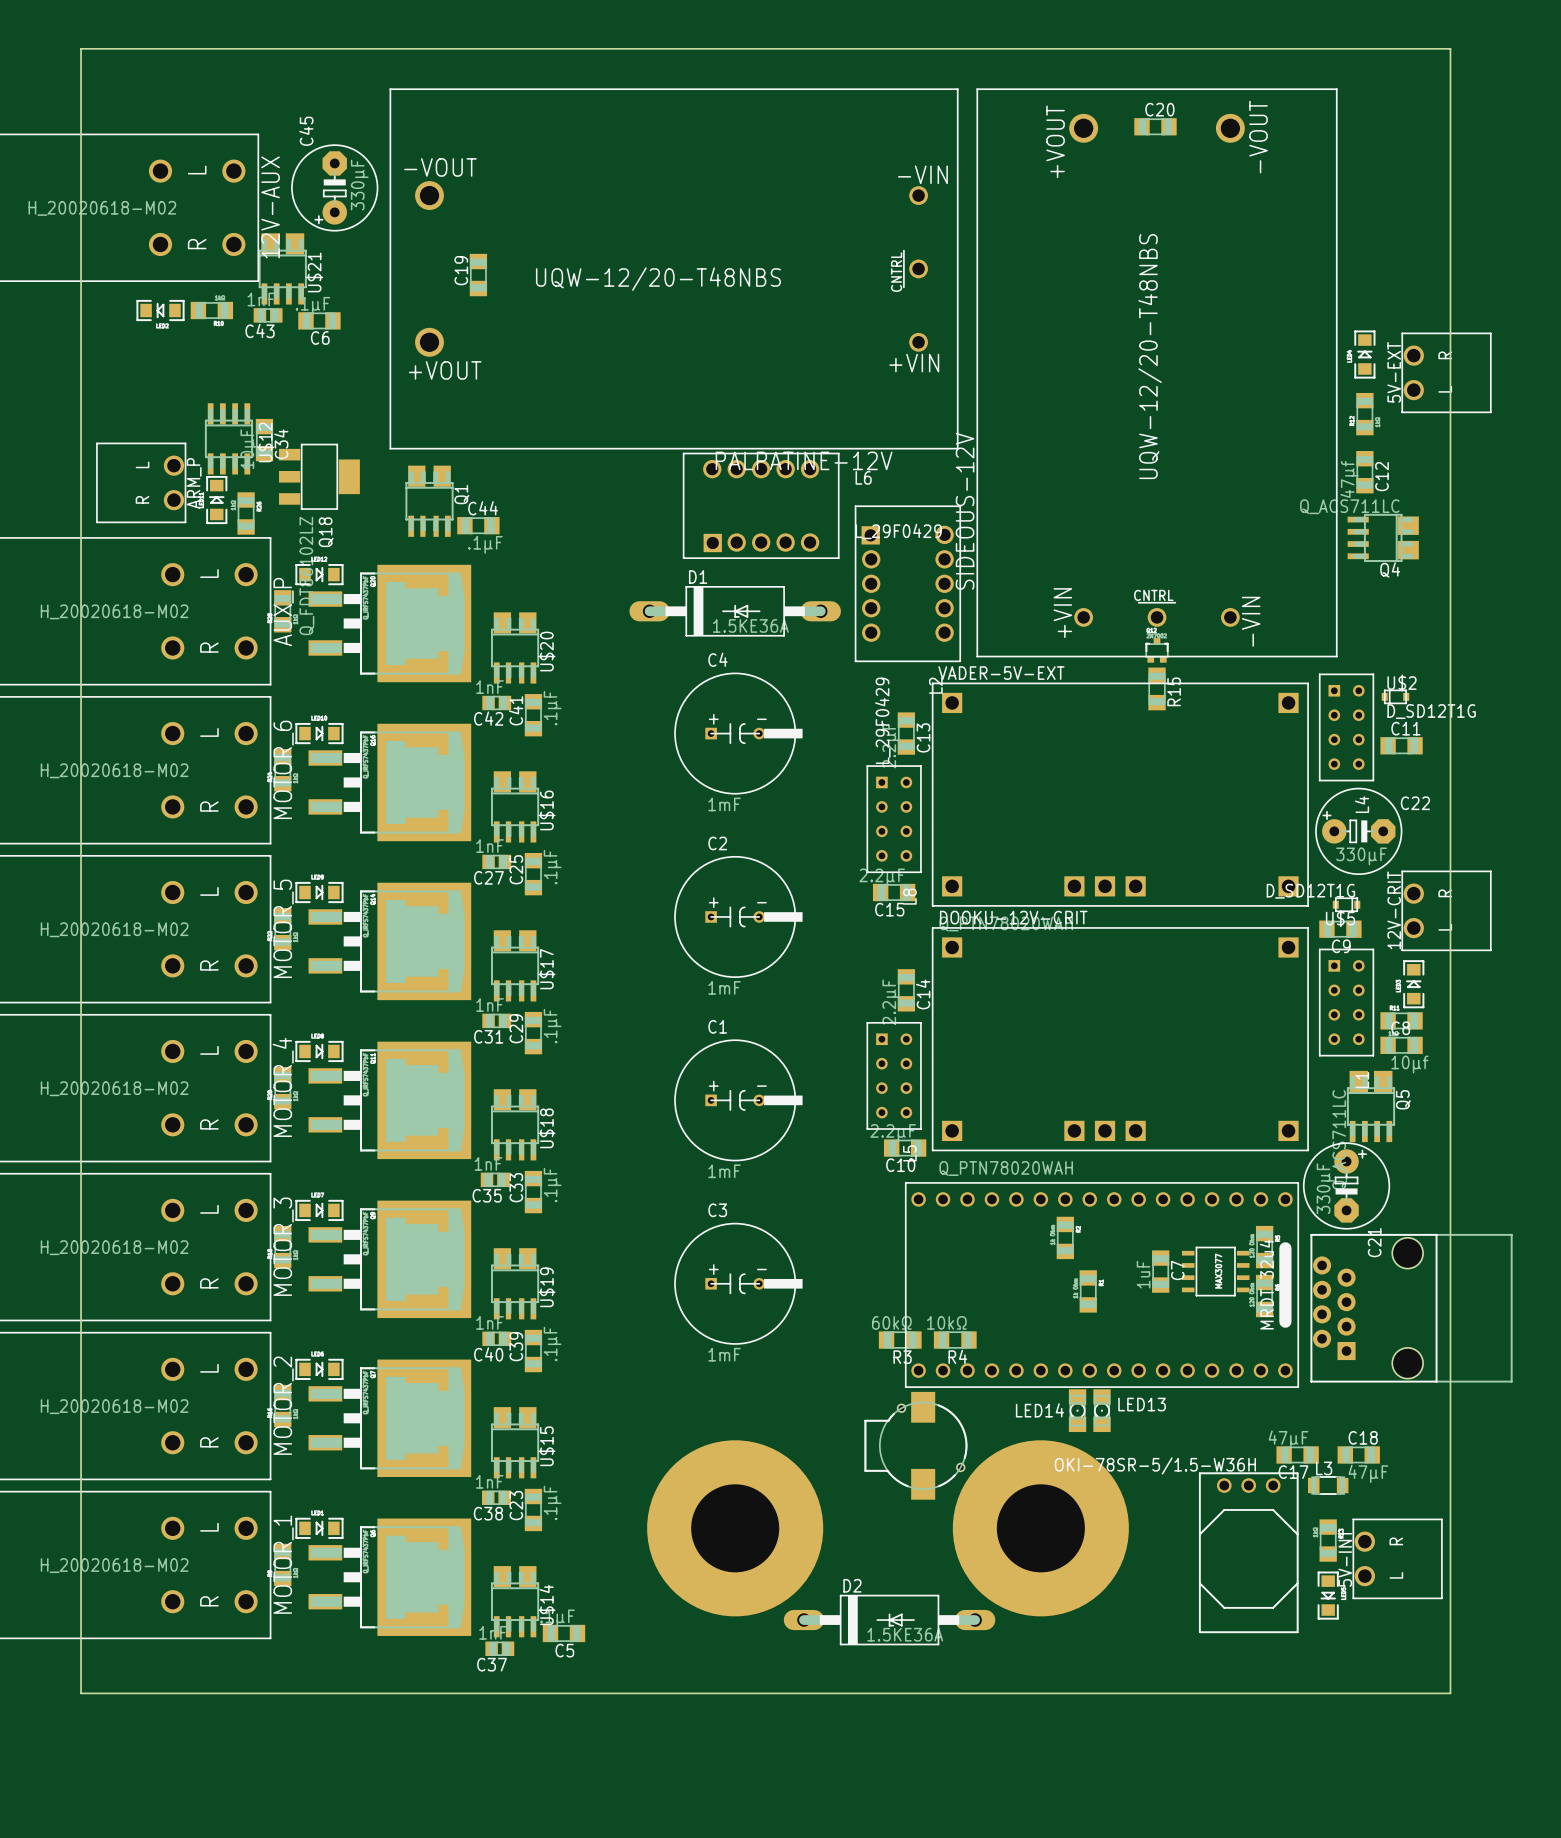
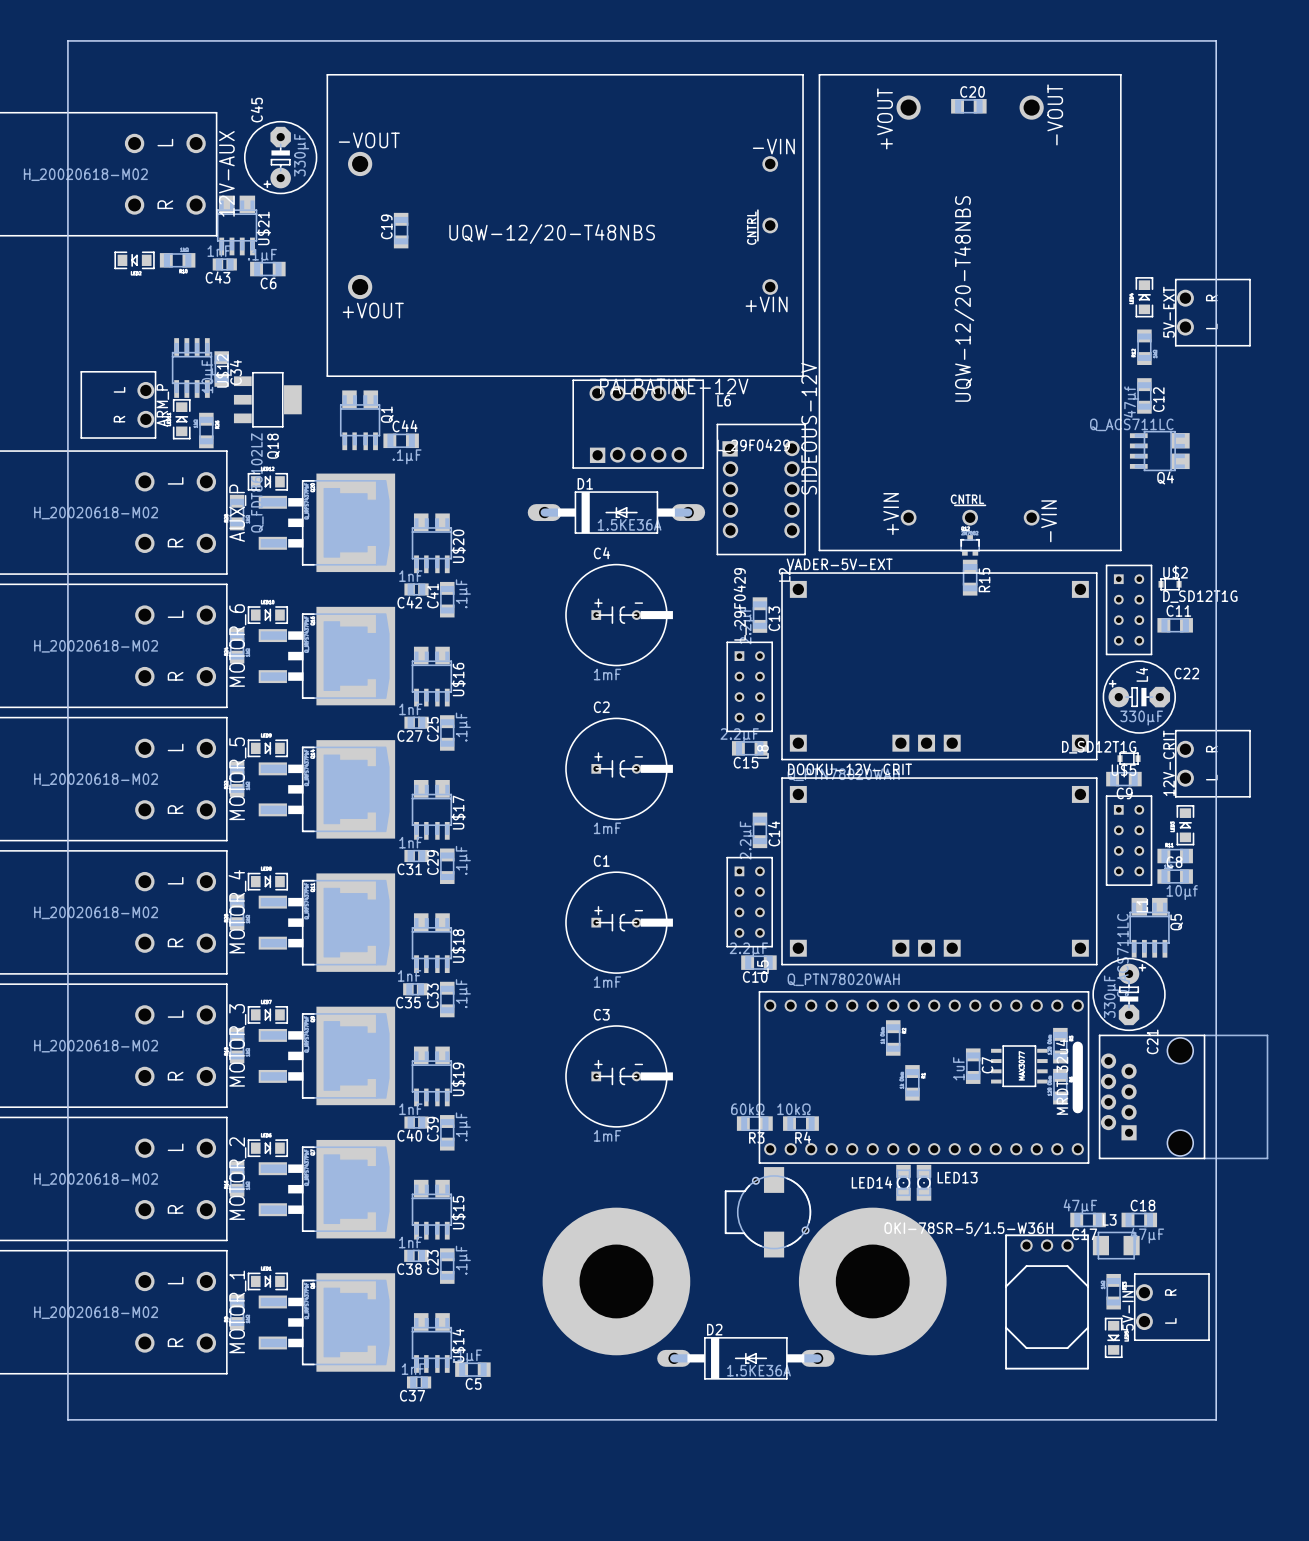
L3 footprint: [1307, 1476, 1349, 1495] -> [1092, 1231, 1140, 1260]

